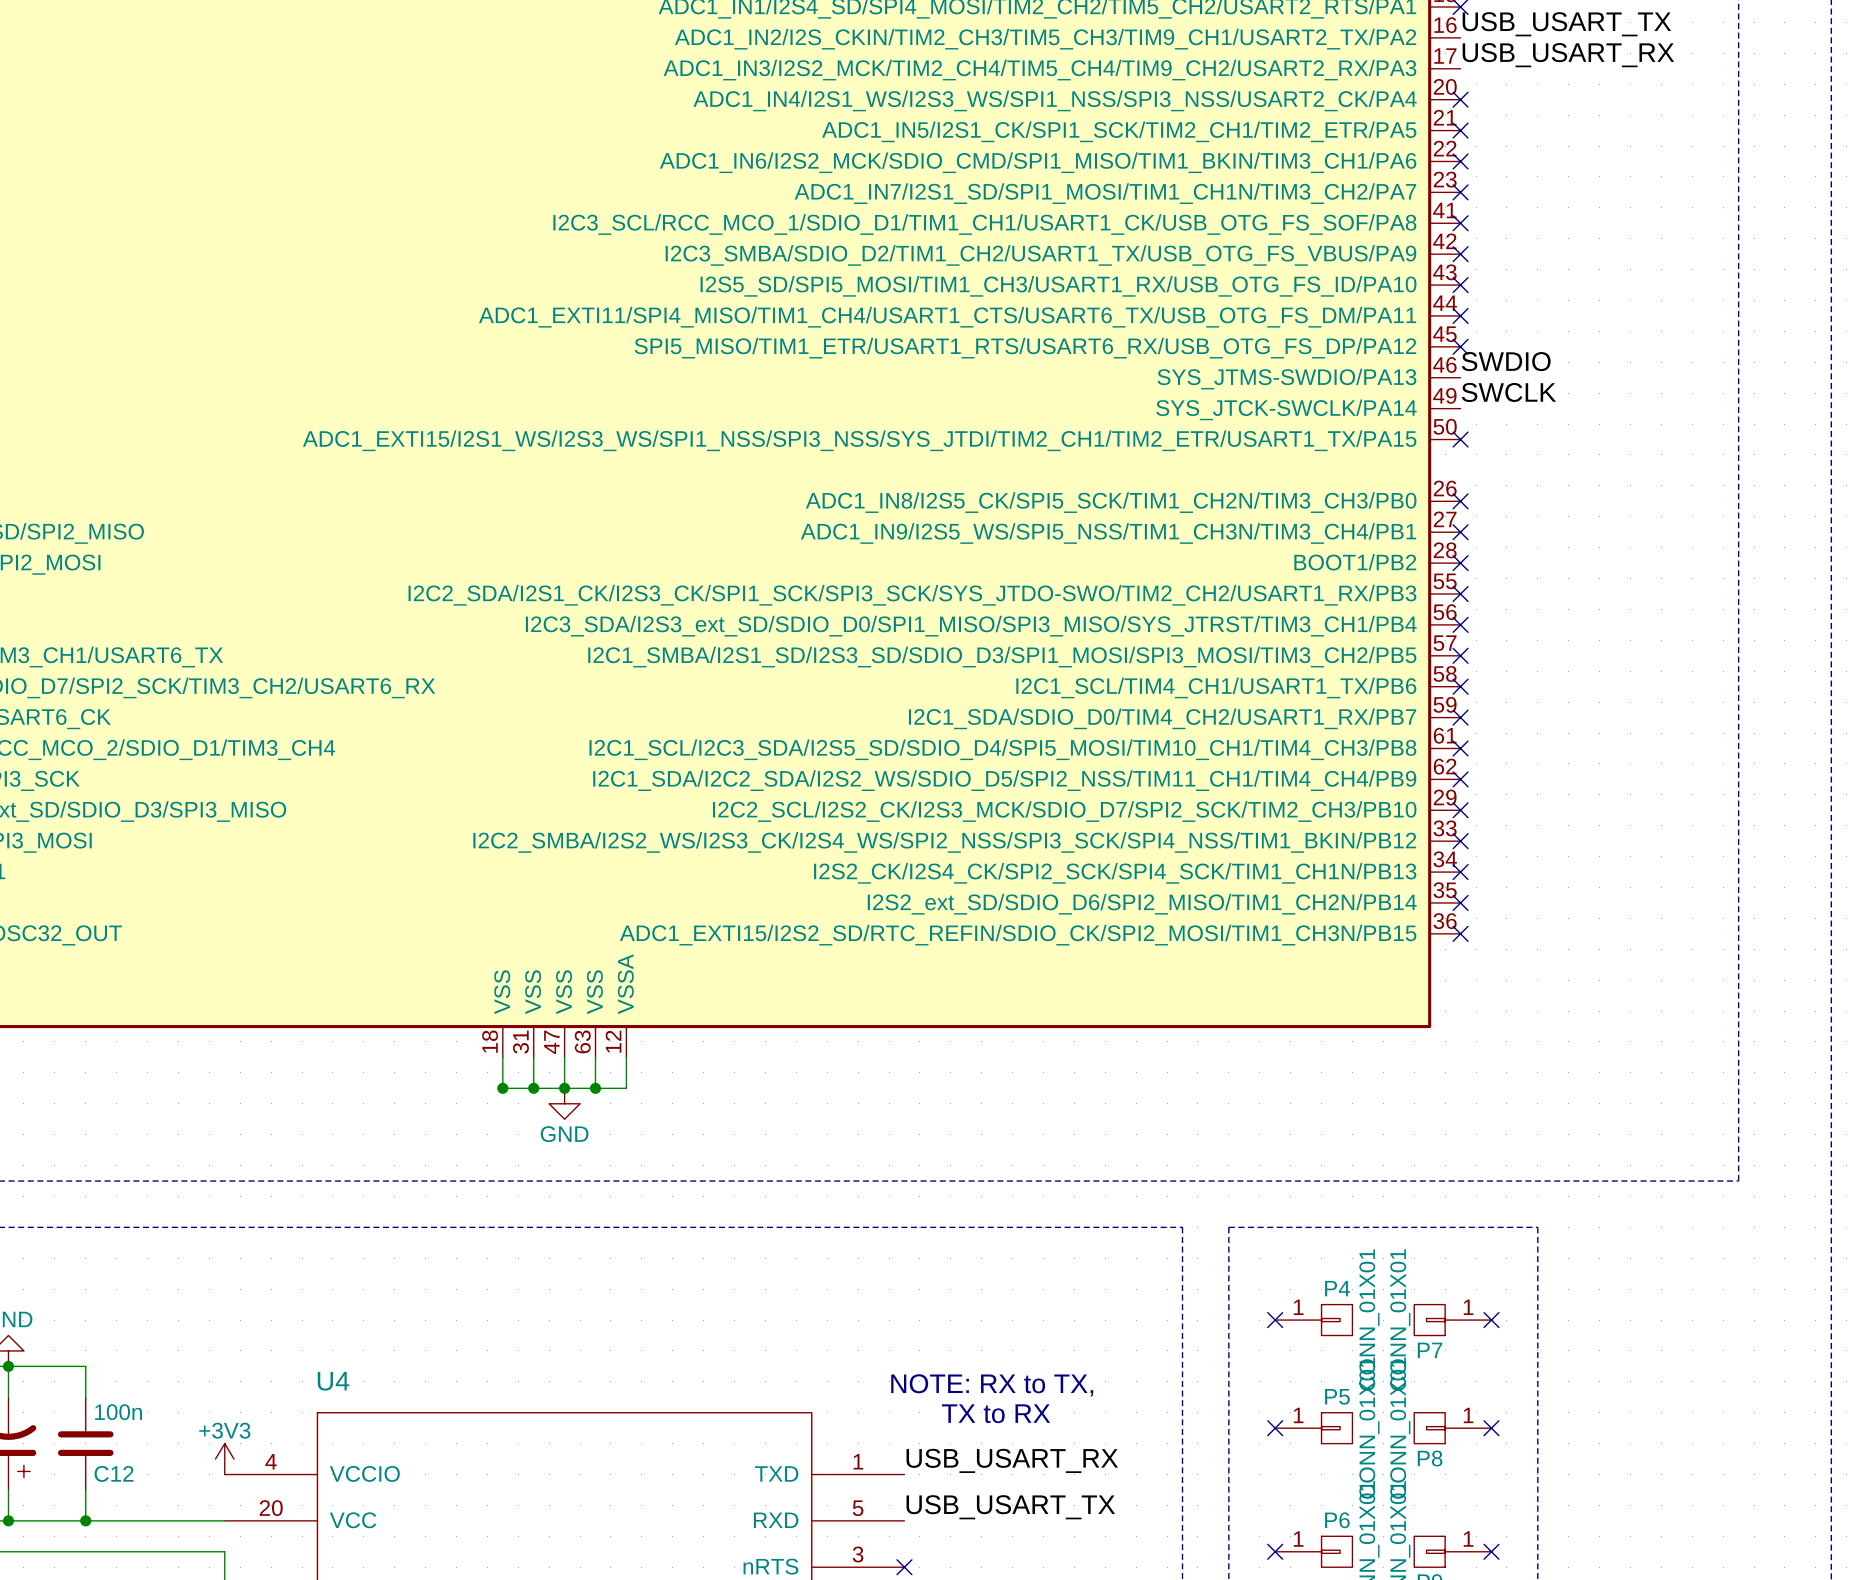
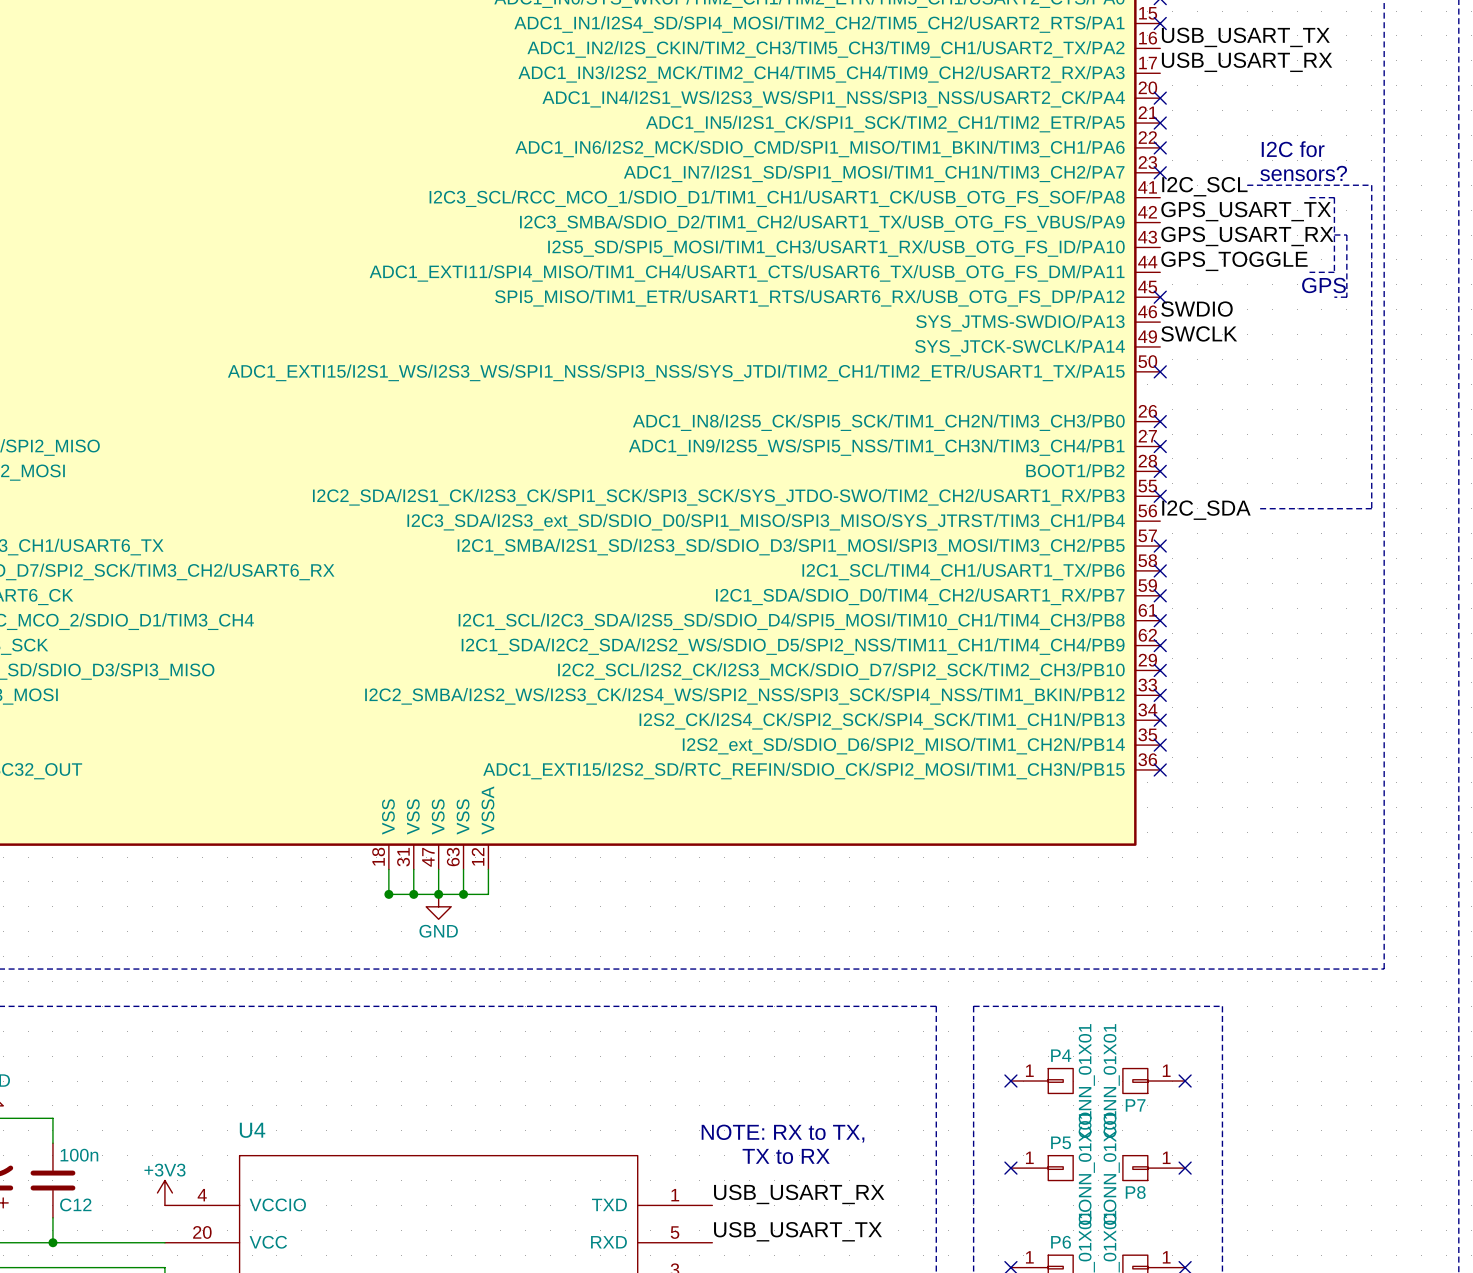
text: none -> I2C for (1293, 149)
text: none -> sensors? (1303, 173)
line: none -> (1247, 185) (1371, 185) (1371, 508) (1259, 508)
label: none -> I2C_SCL (1204, 186)
no-connect mark: (1460, 223) -> none
line: none -> (1309, 197) (1334, 197) (1334, 272) (1309, 272)
label: none -> GPS_USART_TX (1246, 211)
no-connect mark: (1460, 254) -> none
line: none -> (1334, 235) (1346, 235) (1346, 297) (1334, 297)
label: none -> GPS_USART_RX (1247, 236)
no-connect mark: (1460, 285) -> none
label: none -> GPS_TOGGLE (1234, 261)
no-connect mark: (1460, 315) -> none
text: none -> GPS (1323, 285)
label: none -> I2C_SDA (1206, 510)
no-connect mark: (1460, 624) -> none

